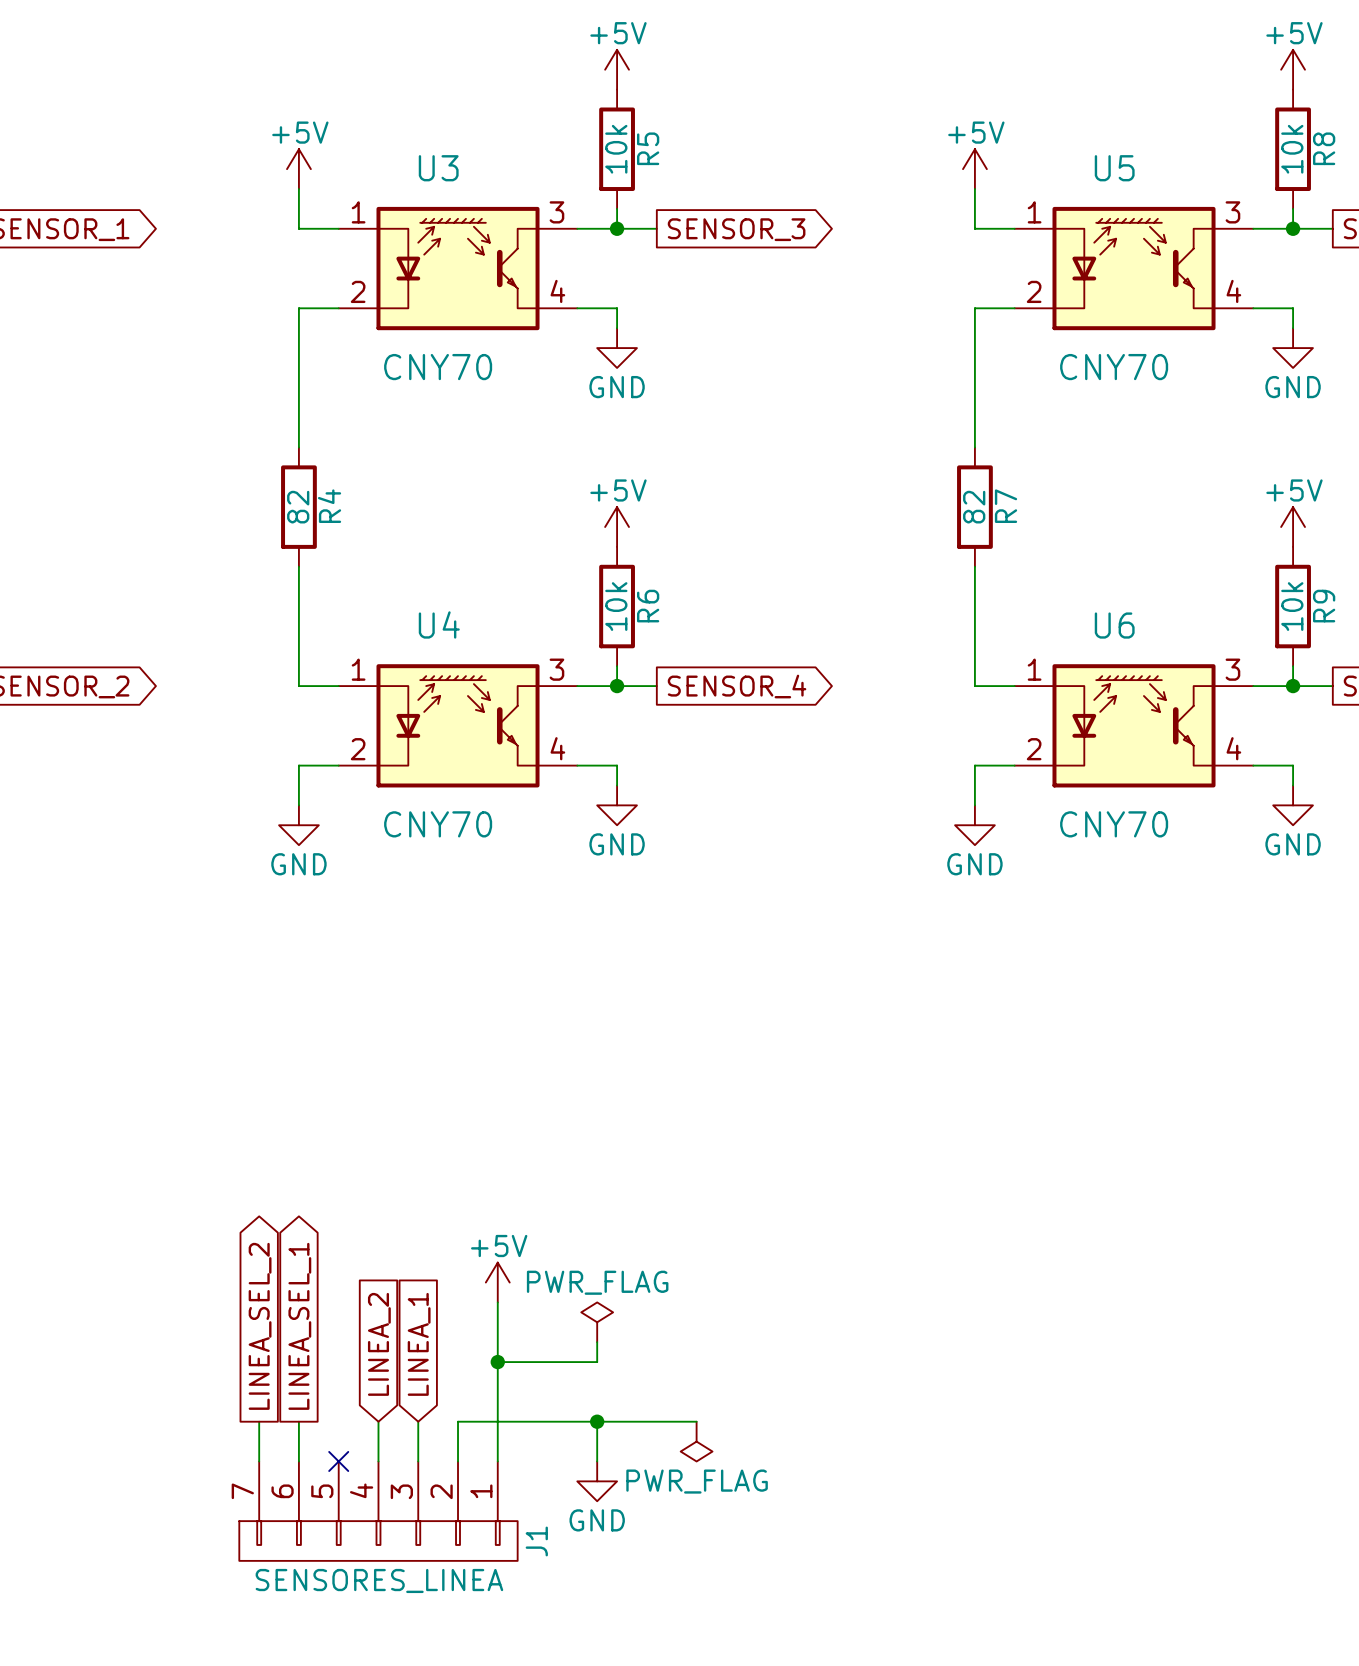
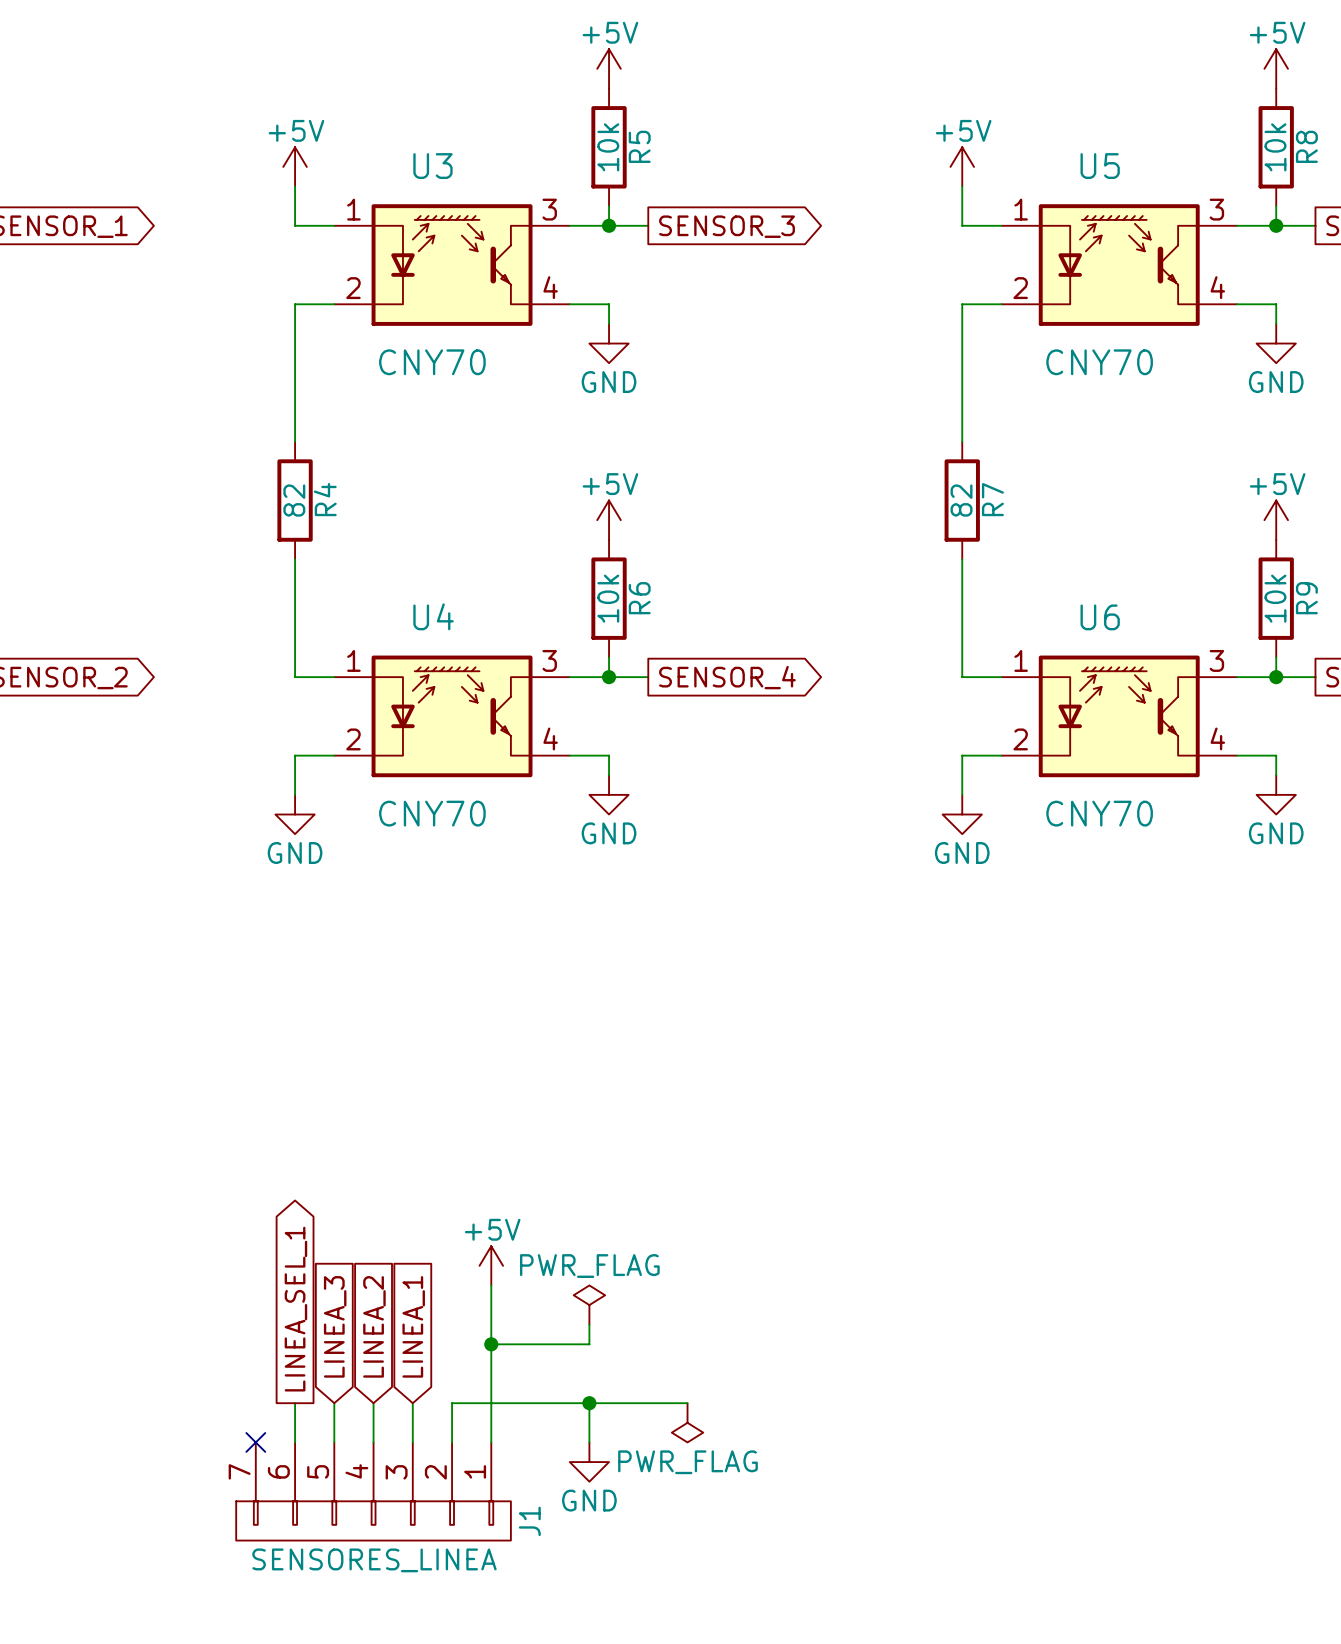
global label: LINEA_SEL_2 (260, 1326) -> none
global label: none -> LINEA_3 (335, 1326)
wire: (259, 1421) (259, 1461) -> (334, 1403) (334, 1442)
no-connect mark position: (338, 1461) -> (255, 1442)

